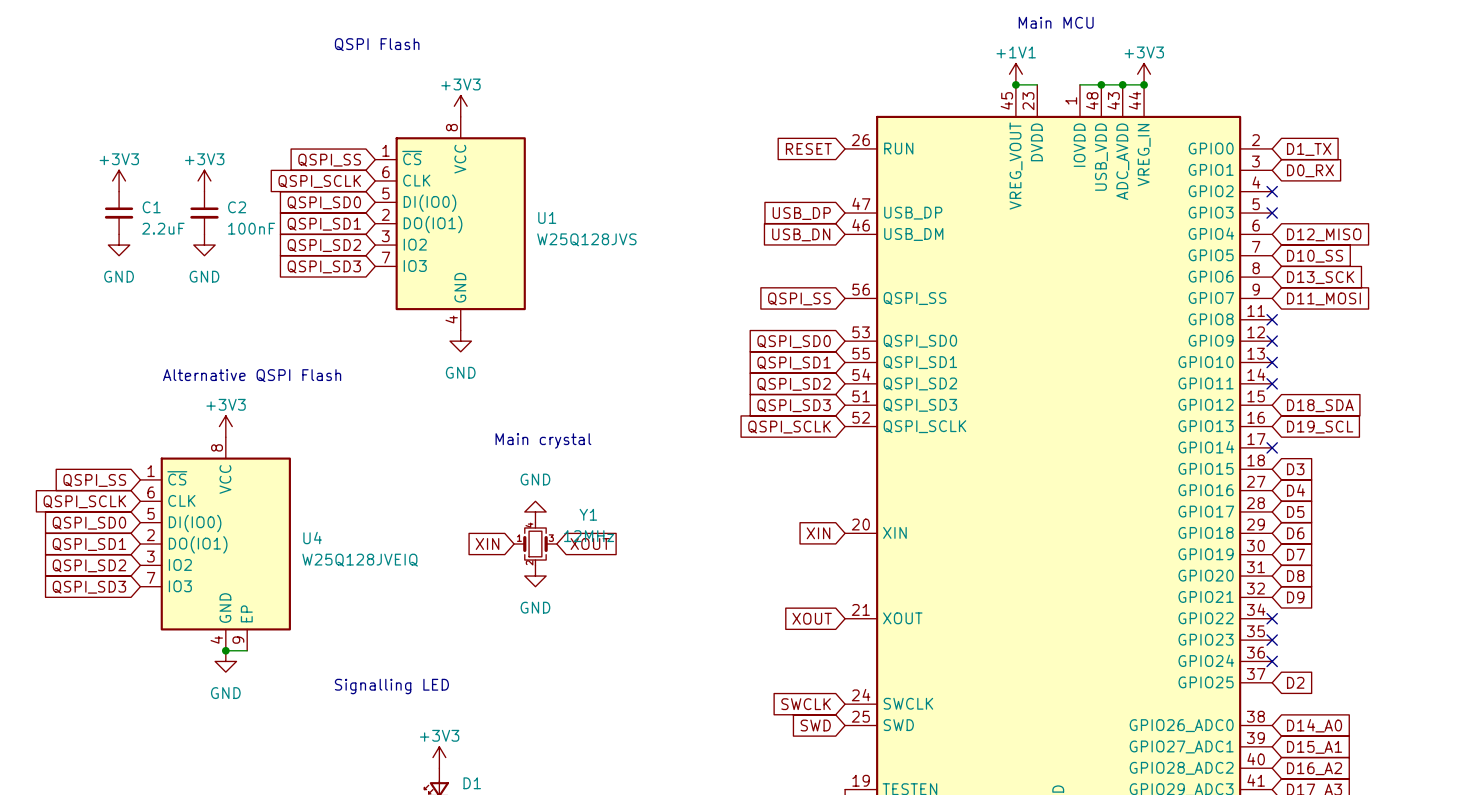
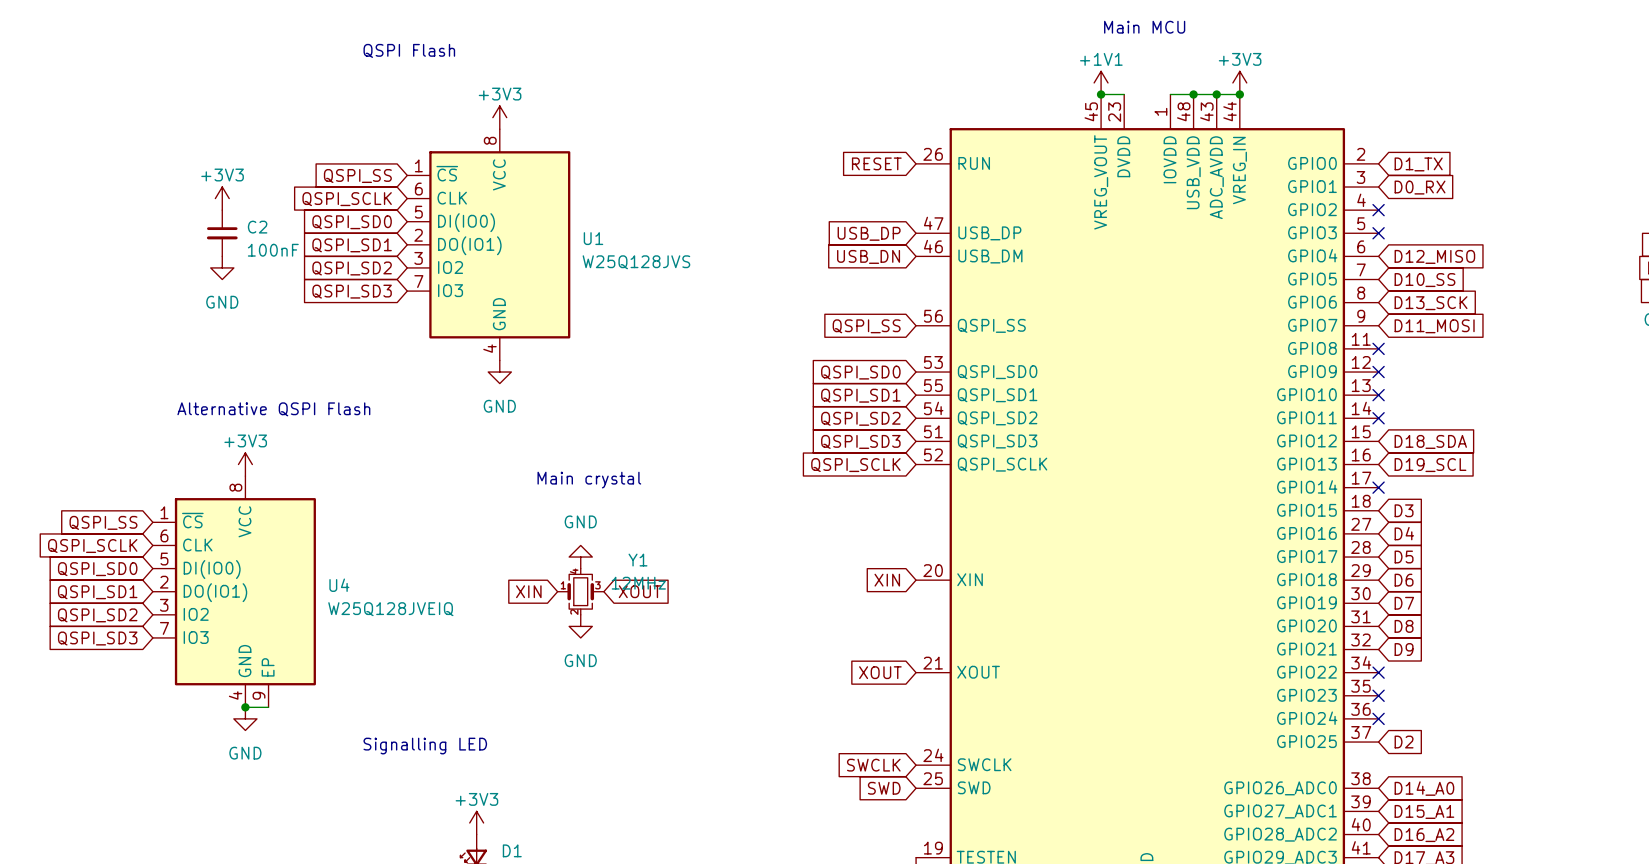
power symbol: +3V3 (119, 180) -> none
C1: 2.2uF (119, 213) -> none
power symbol: GND (119, 245) -> none

